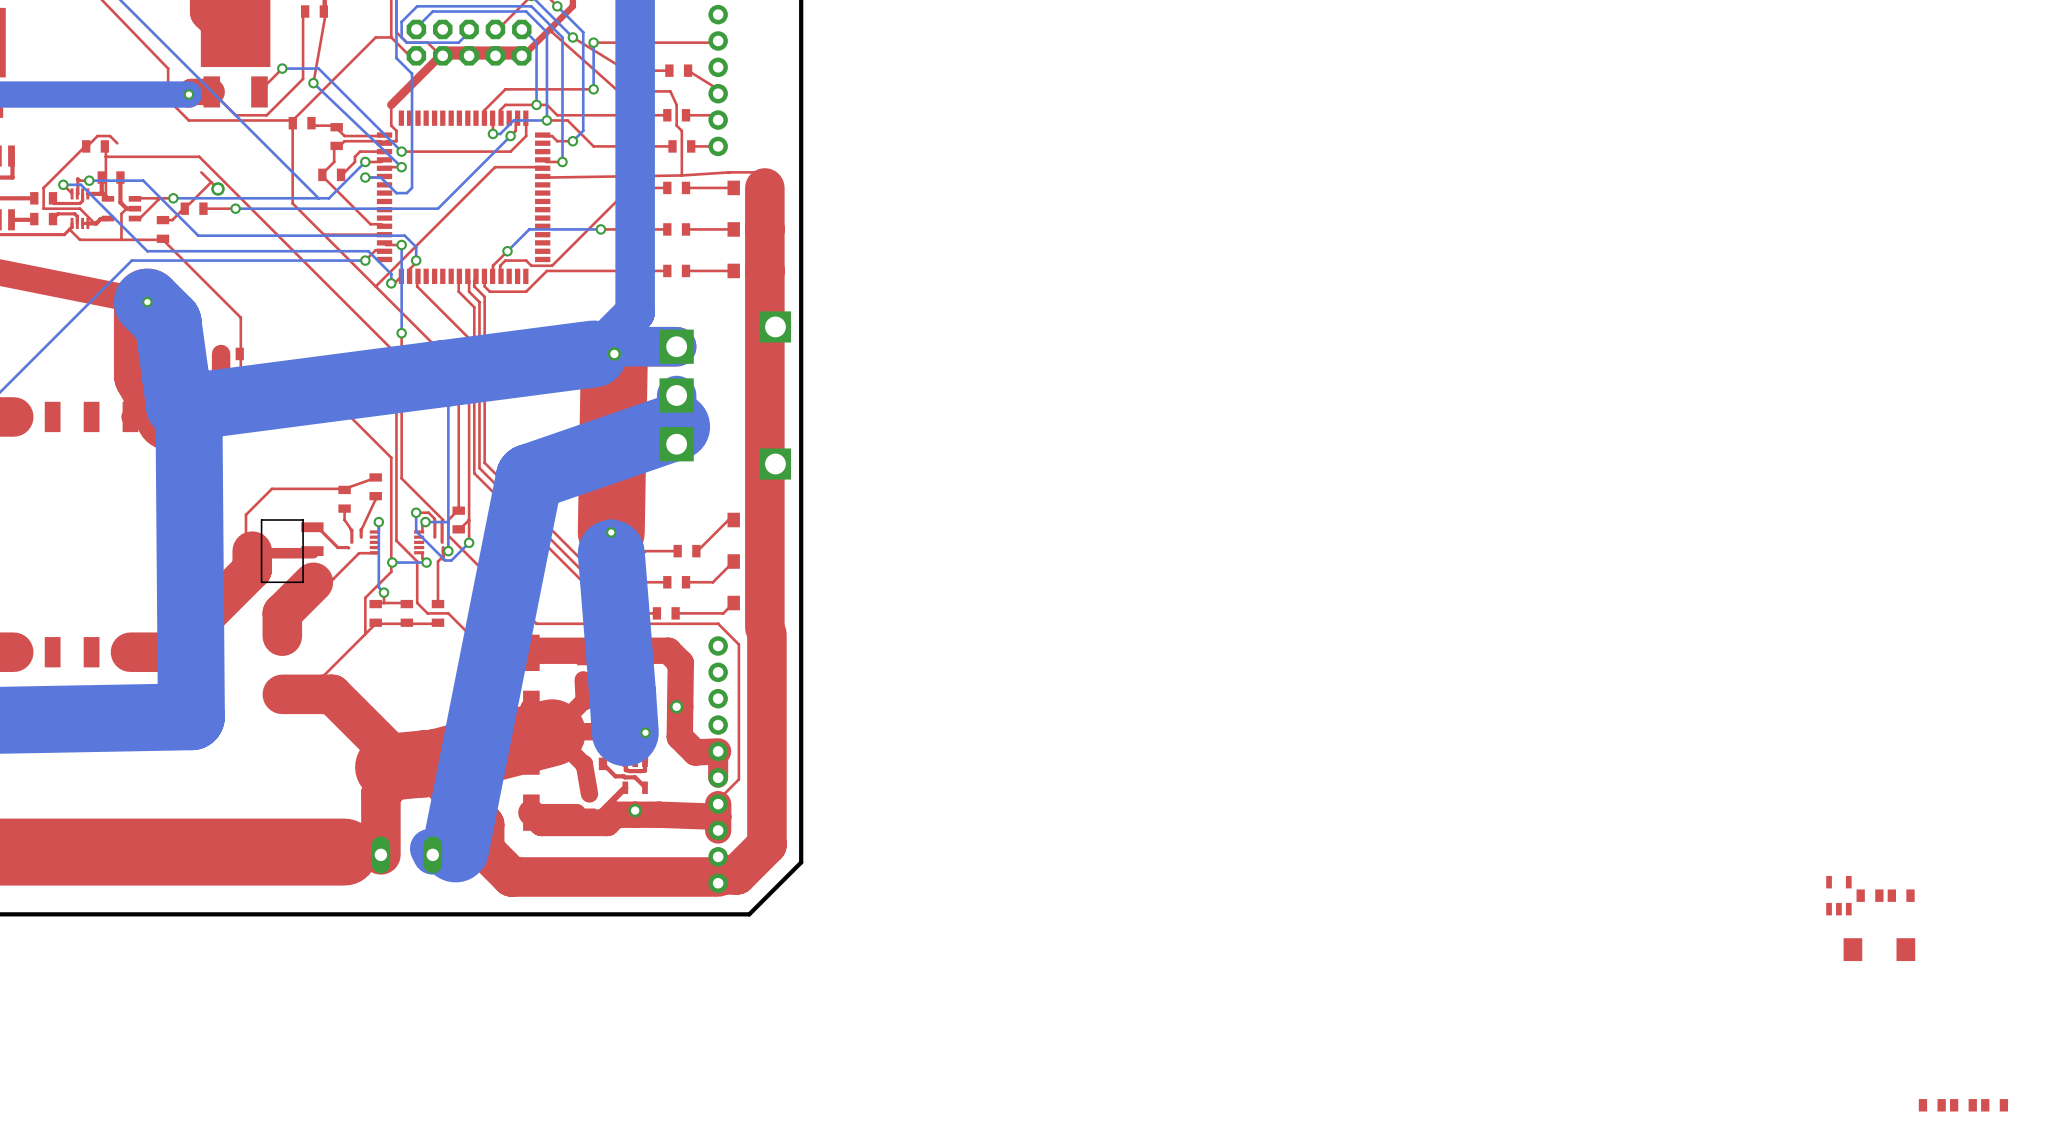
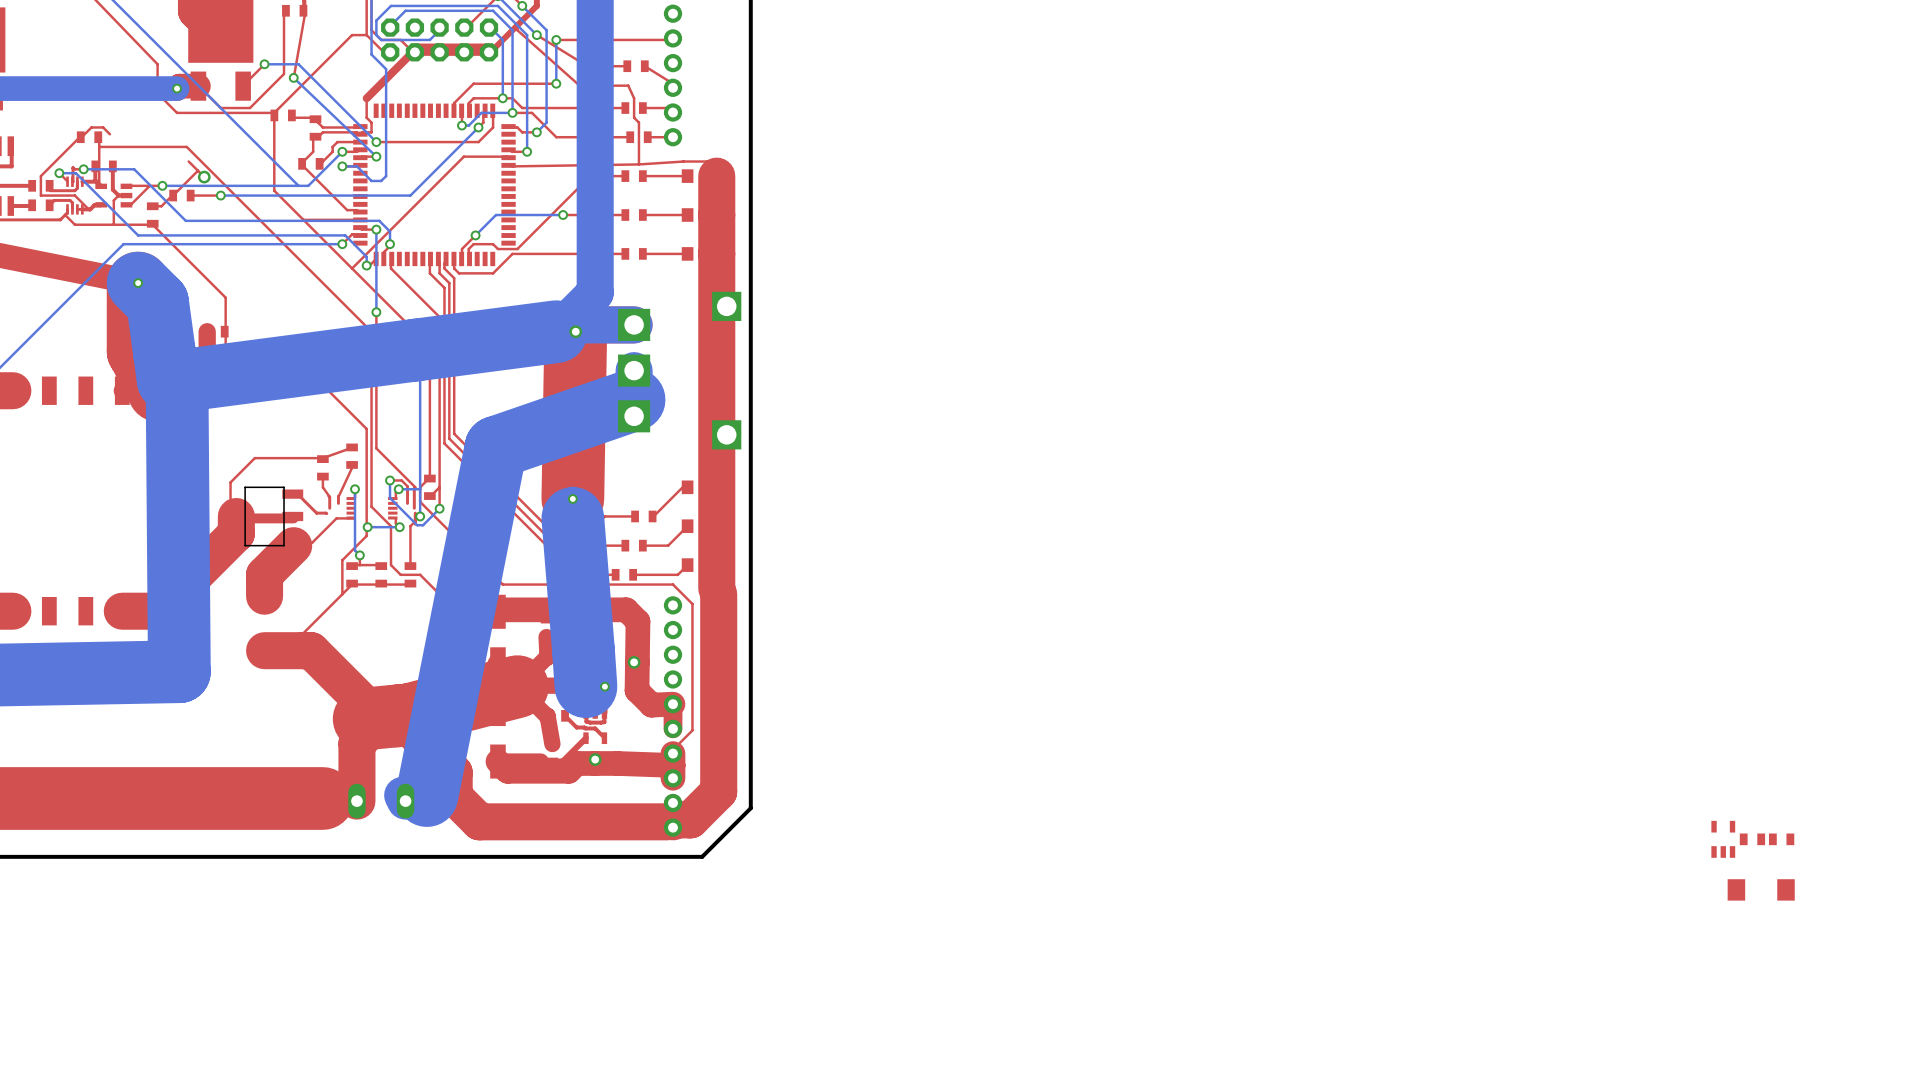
part: (1932, 1105) -> none
part: (1963, 1105) -> none
part: (1994, 1105) -> none

